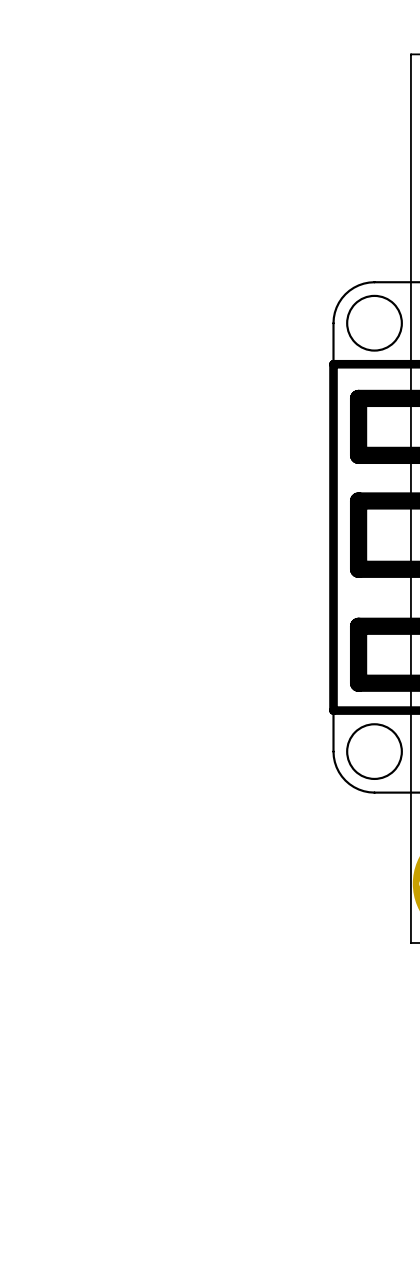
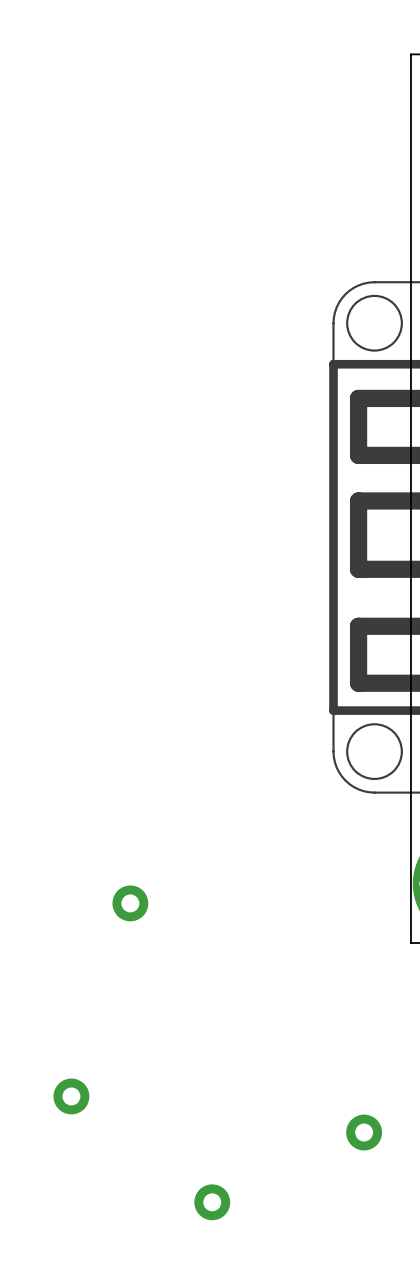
part: none -> (130, 903)
part: none -> (71, 1096)
part: none -> (364, 1132)
part: none -> (212, 1202)

